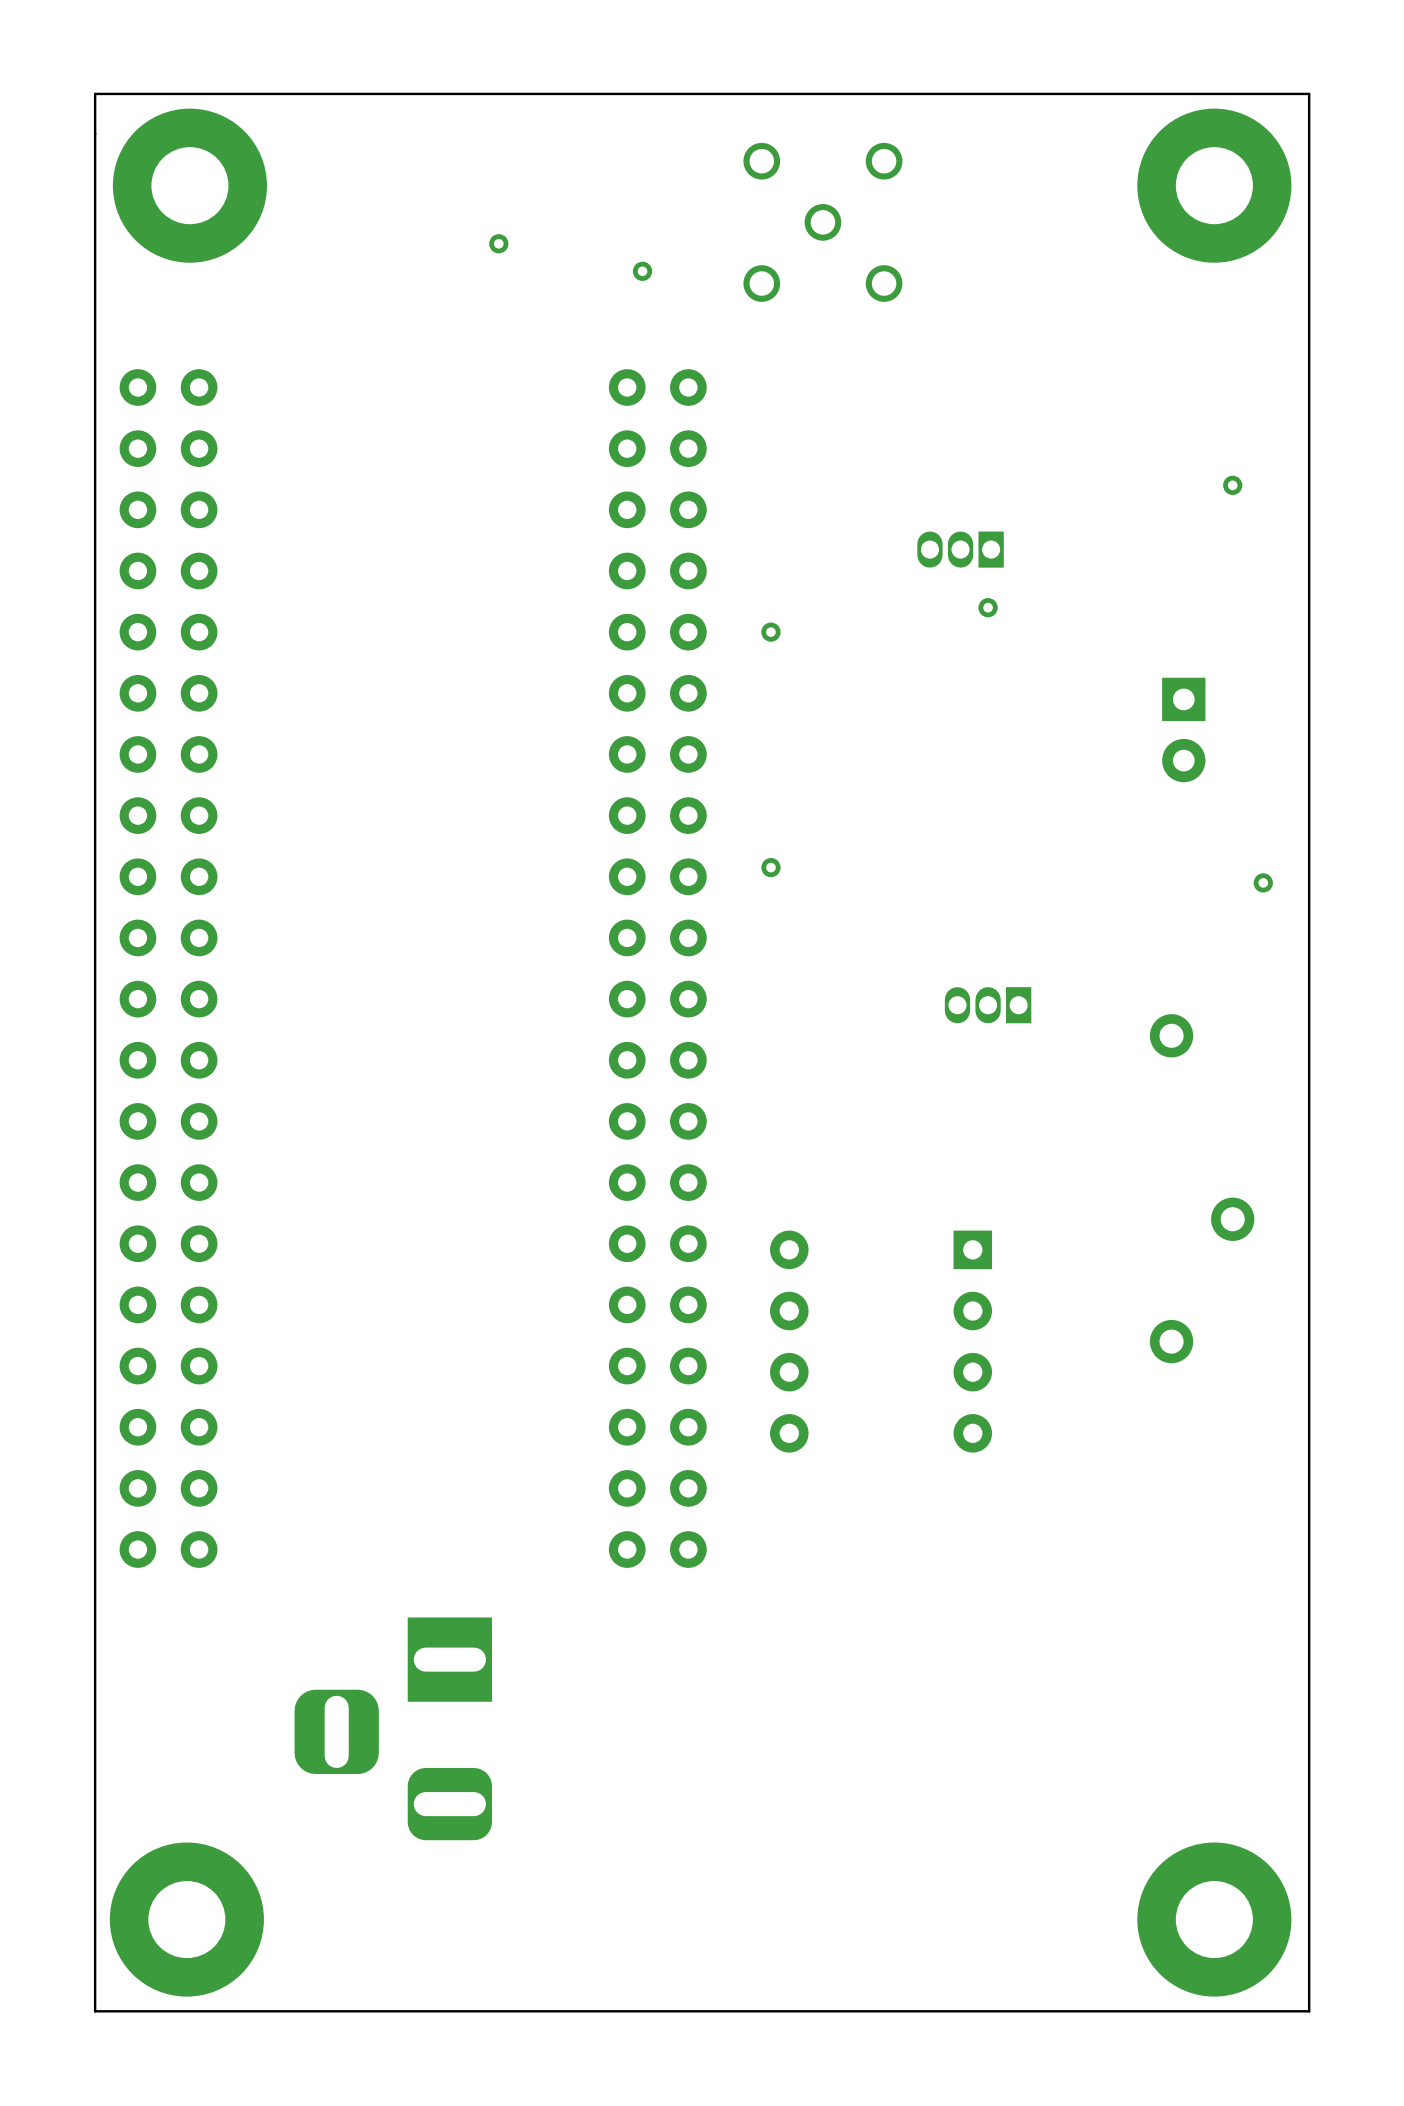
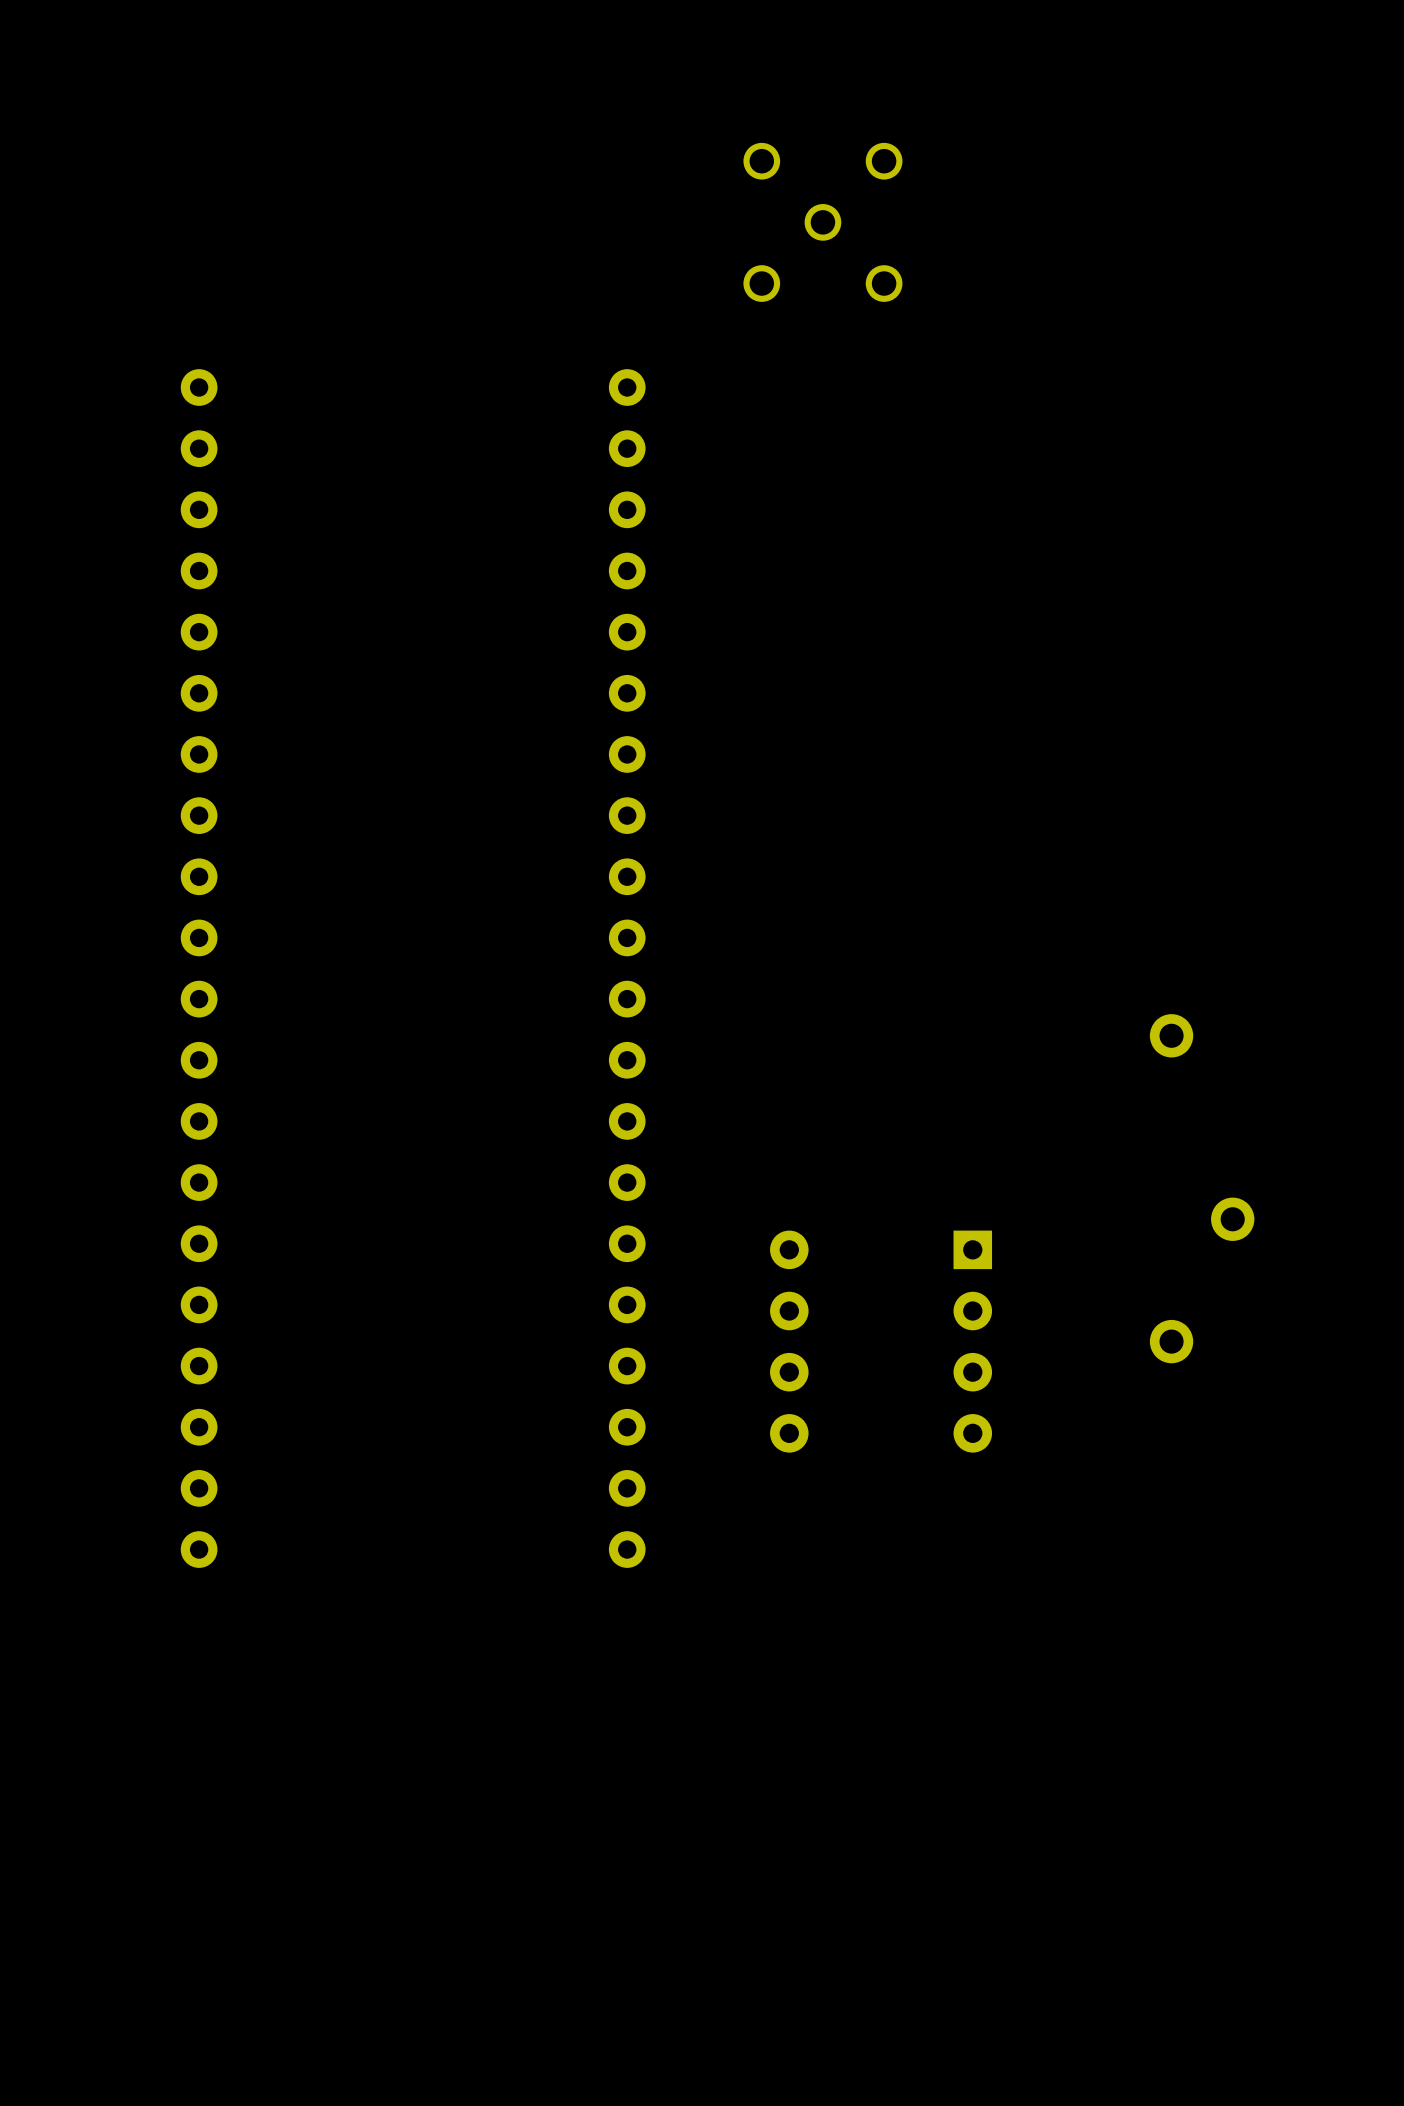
board edge: (1309, 93) (95, 93) (95, 2011) (1309, 2011) (1309, 93) -> none
part: (189, 185) -> none
part: (1214, 185) -> none
via: (498, 243) -> none
via: (642, 271) -> none
part: (137, 387) -> none
part: (688, 387) -> none
part: (137, 448) -> none
part: (688, 448) -> none
via: (1232, 485) -> none
part: (137, 509) -> none
part: (688, 509) -> none
part: (960, 549) -> none
part: (137, 570) -> none
part: (688, 570) -> none
via: (988, 607) -> none
part: (137, 632) -> none
part: (688, 632) -> none
via: (770, 632) -> none
part: (137, 693) -> none
part: (688, 693) -> none
part: (1183, 730) -> none
part: (137, 754) -> none
part: (688, 754) -> none
part: (137, 815) -> none
part: (688, 815) -> none
via: (770, 867) -> none
part: (137, 876) -> none
part: (688, 876) -> none
via: (1263, 882) -> none
part: (137, 937) -> none
part: (688, 937) -> none
part: (137, 999) -> none
part: (688, 999) -> none
part: (988, 1005) -> none
part: (137, 1060) -> none
part: (688, 1060) -> none
part: (137, 1121) -> none
part: (688, 1121) -> none
part: (137, 1182) -> none
part: (688, 1182) -> none
part: (137, 1243) -> none
part: (688, 1243) -> none
part: (137, 1304) -> none
part: (688, 1304) -> none
part: (137, 1366) -> none
part: (688, 1366) -> none
part: (137, 1427) -> none
part: (688, 1427) -> none
part: (137, 1488) -> none
part: (688, 1488) -> none
part: (137, 1549) -> none
part: (688, 1549) -> none
part: (393, 1728) -> none
part: (186, 1919) -> none
part: (1214, 1919) -> none

